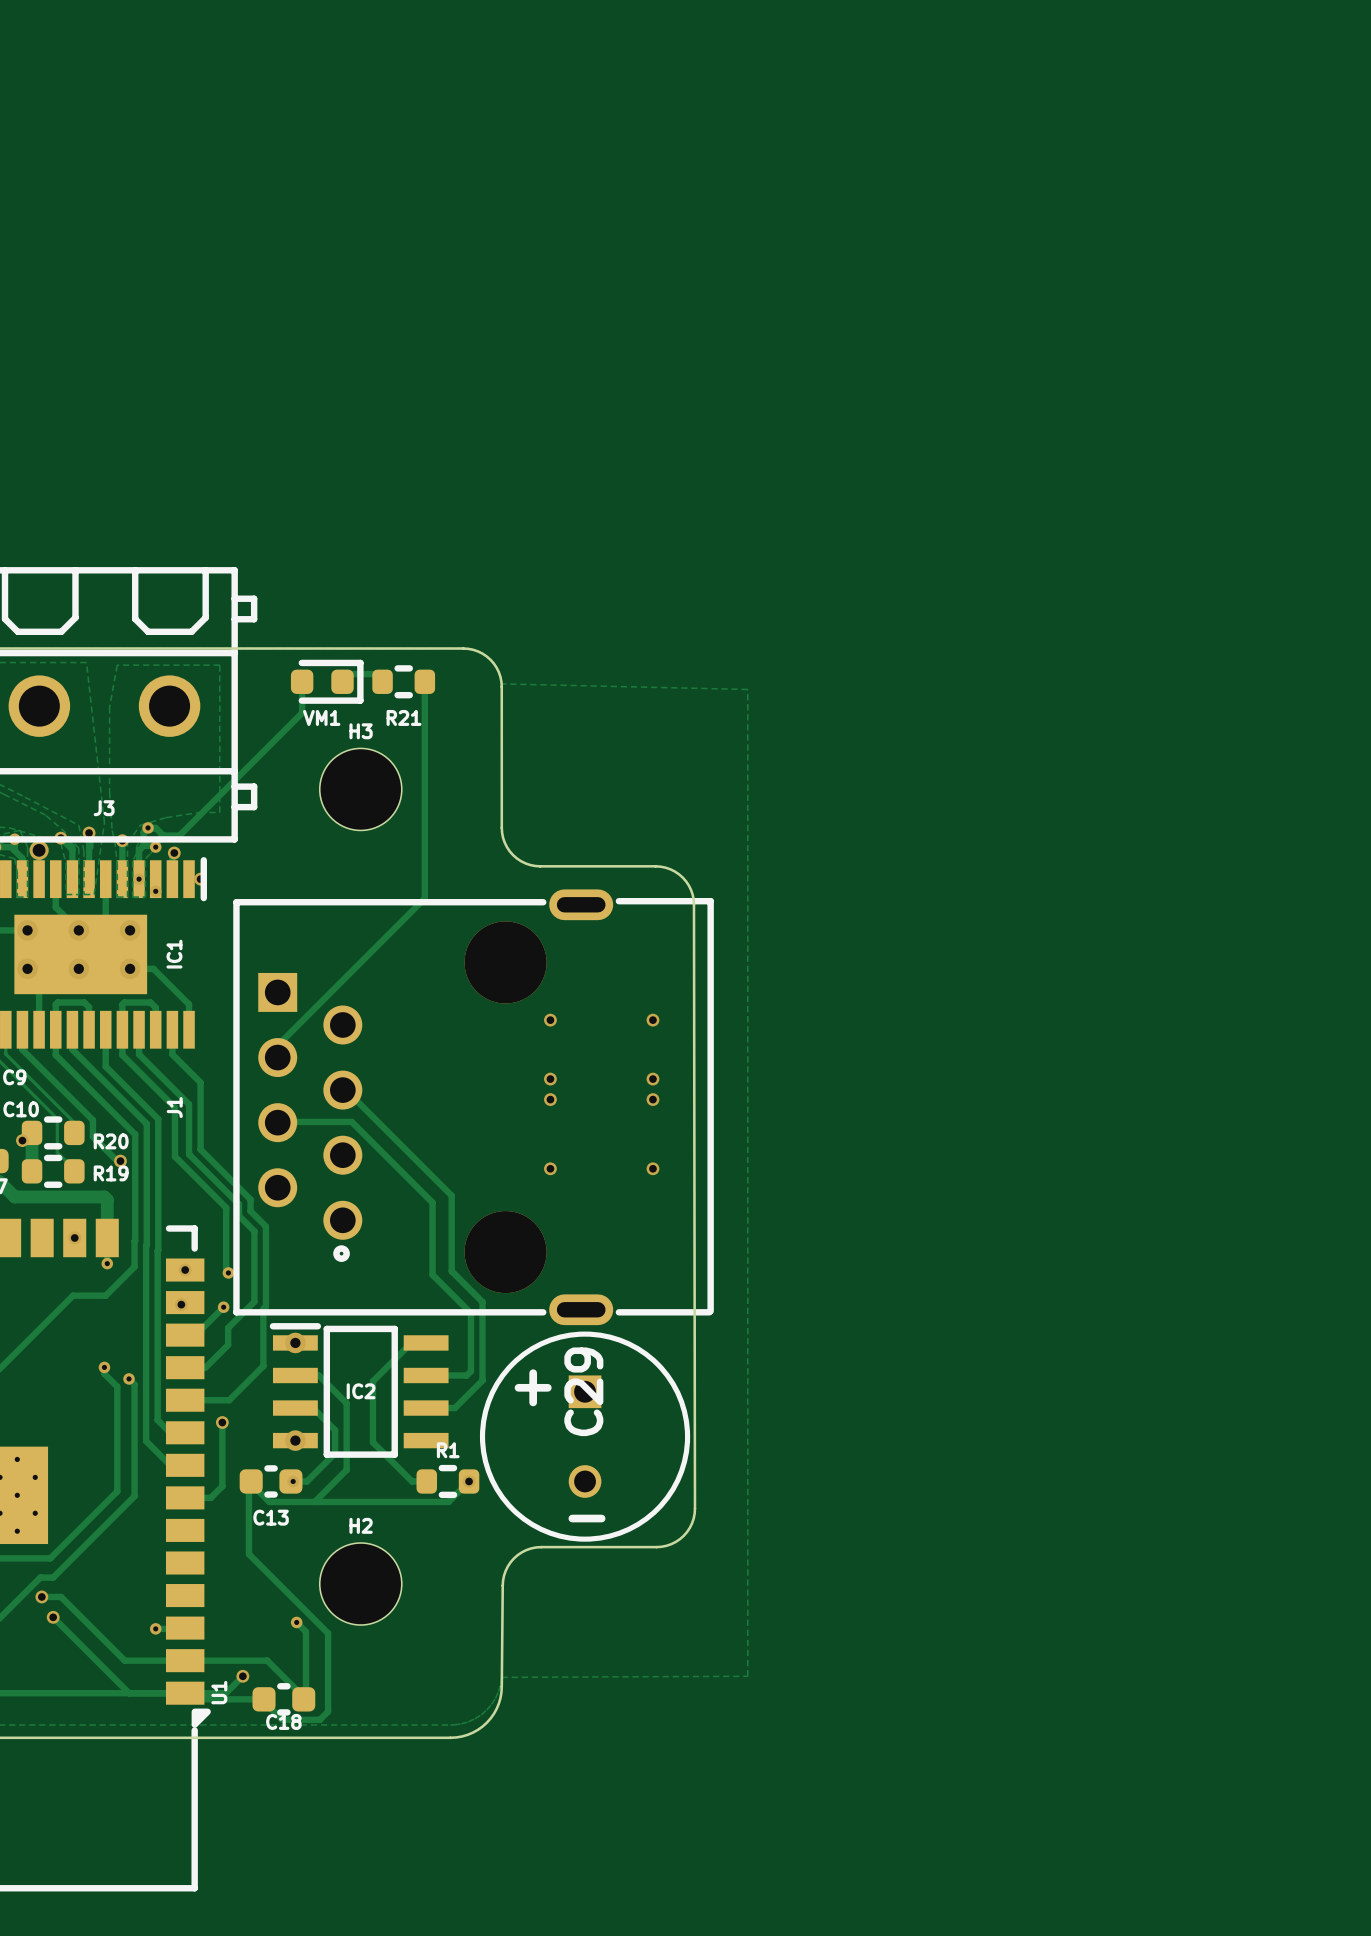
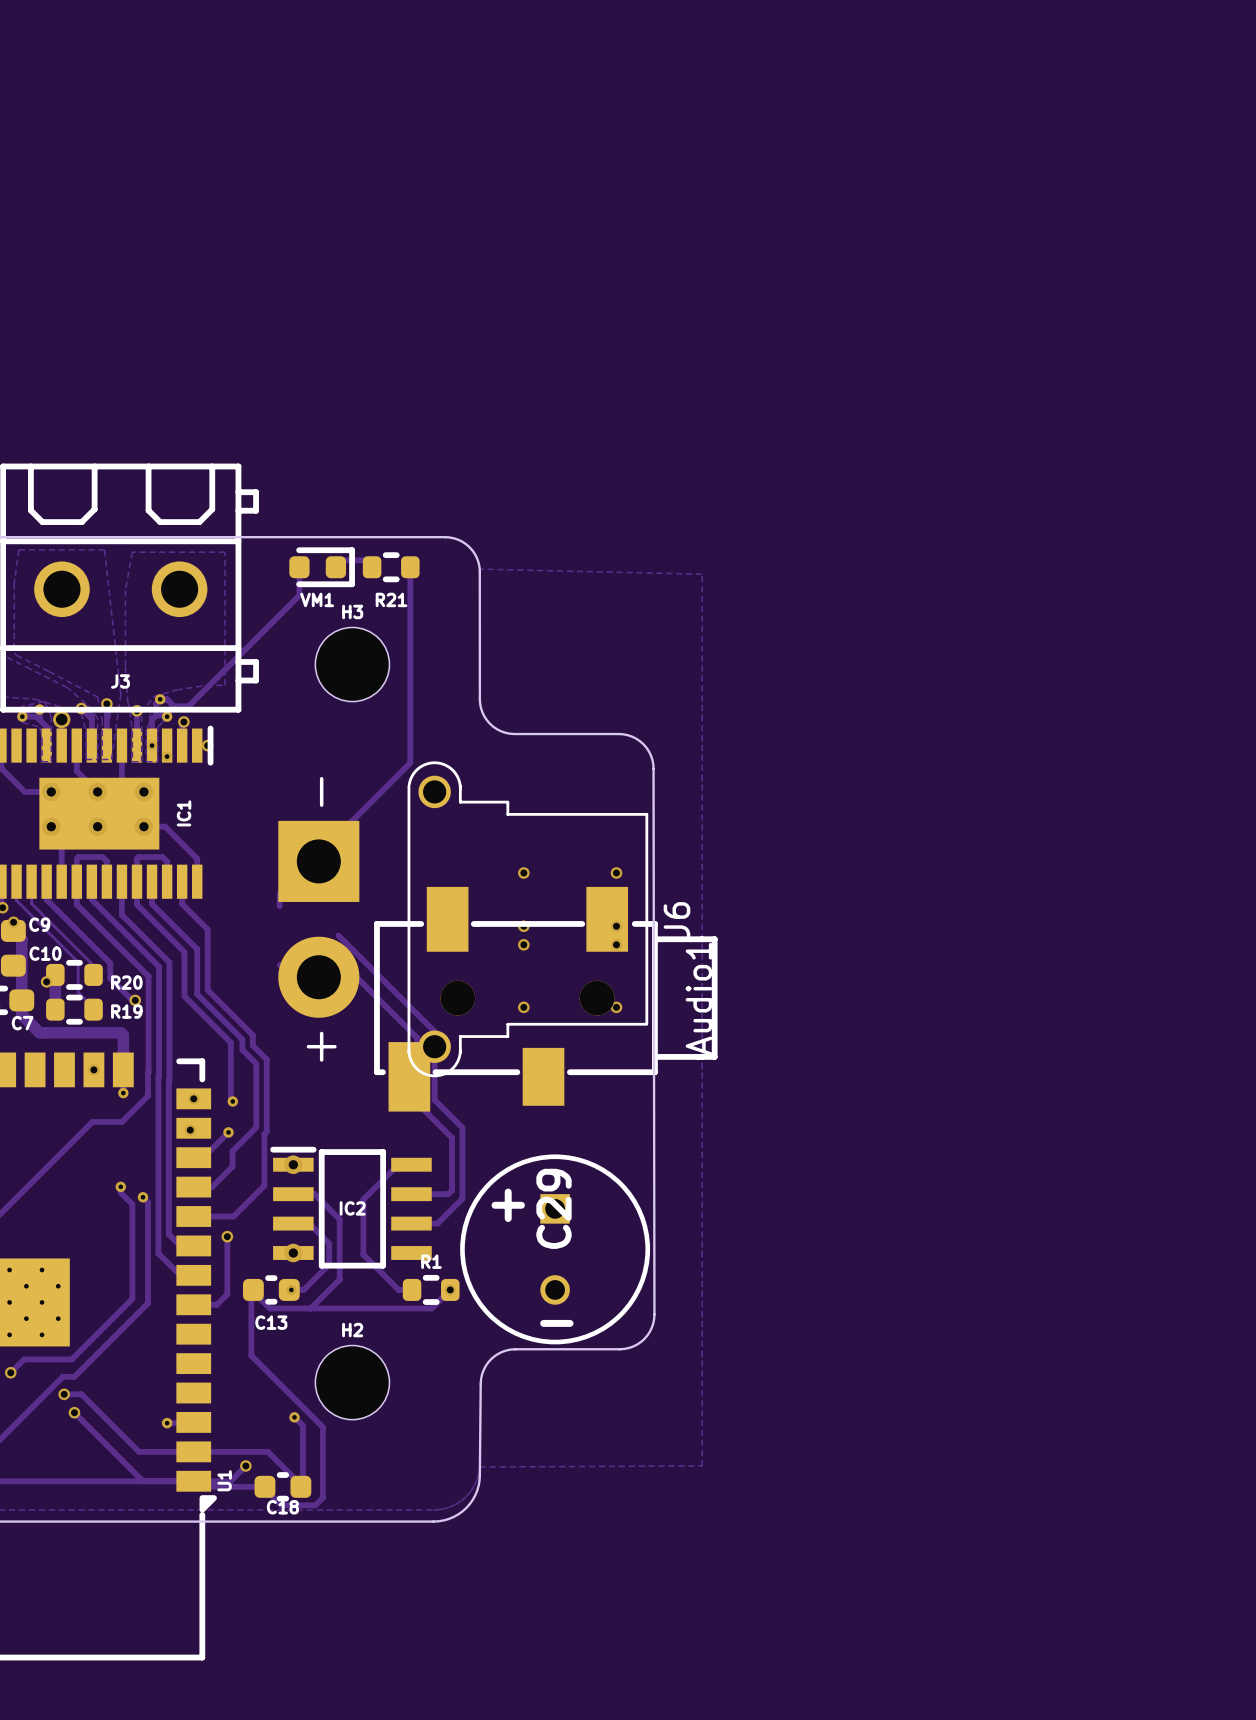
J6: none -> (463, 919)
J1: (473, 1107) -> none
Audio1: none -> (545, 999)

